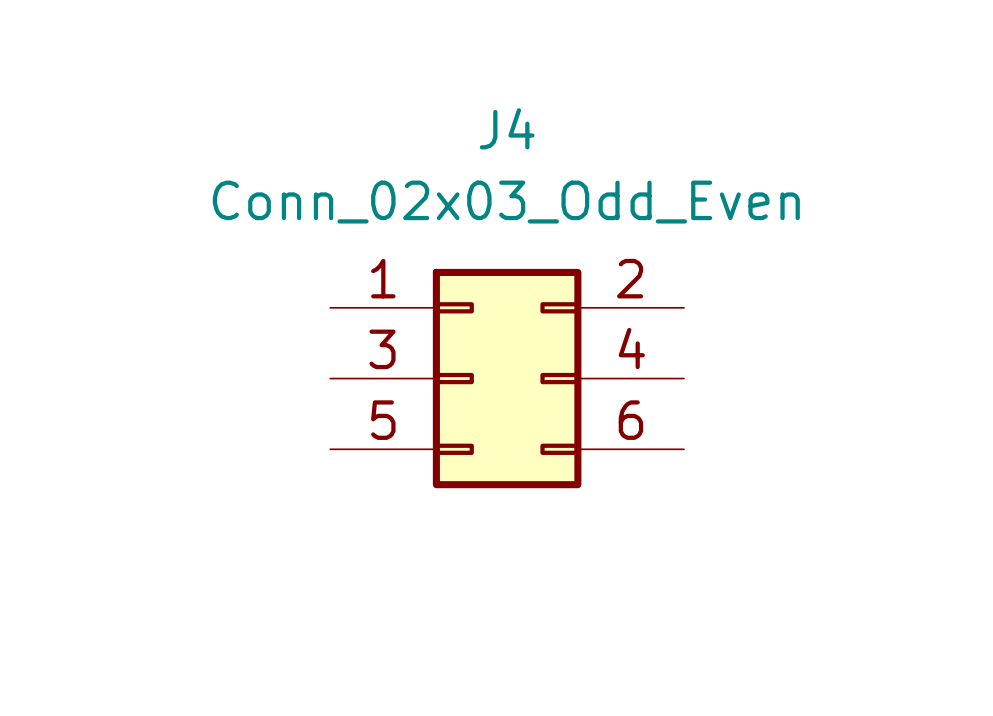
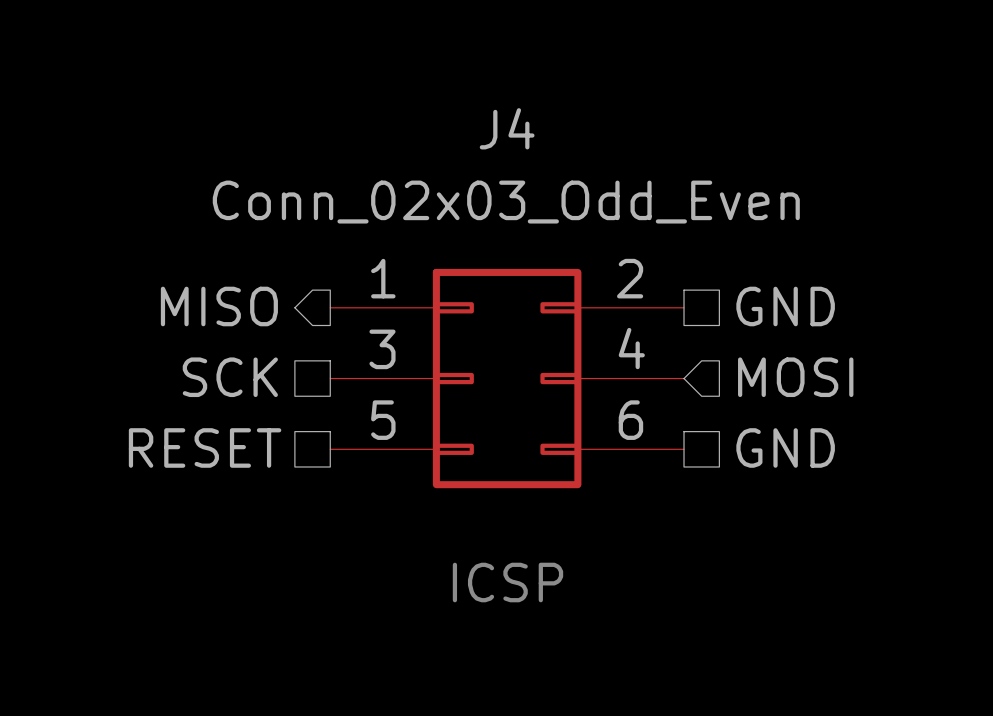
hierarchical label: none -> MISO (219, 306)
hierarchical label: none -> GND (785, 306)
hierarchical label: none -> SCK (230, 377)
hierarchical label: none -> MOSI (795, 377)
hierarchical label: none -> RESET (205, 447)
hierarchical label: none -> GND (785, 447)
text: none -> ICSP (507, 582)

